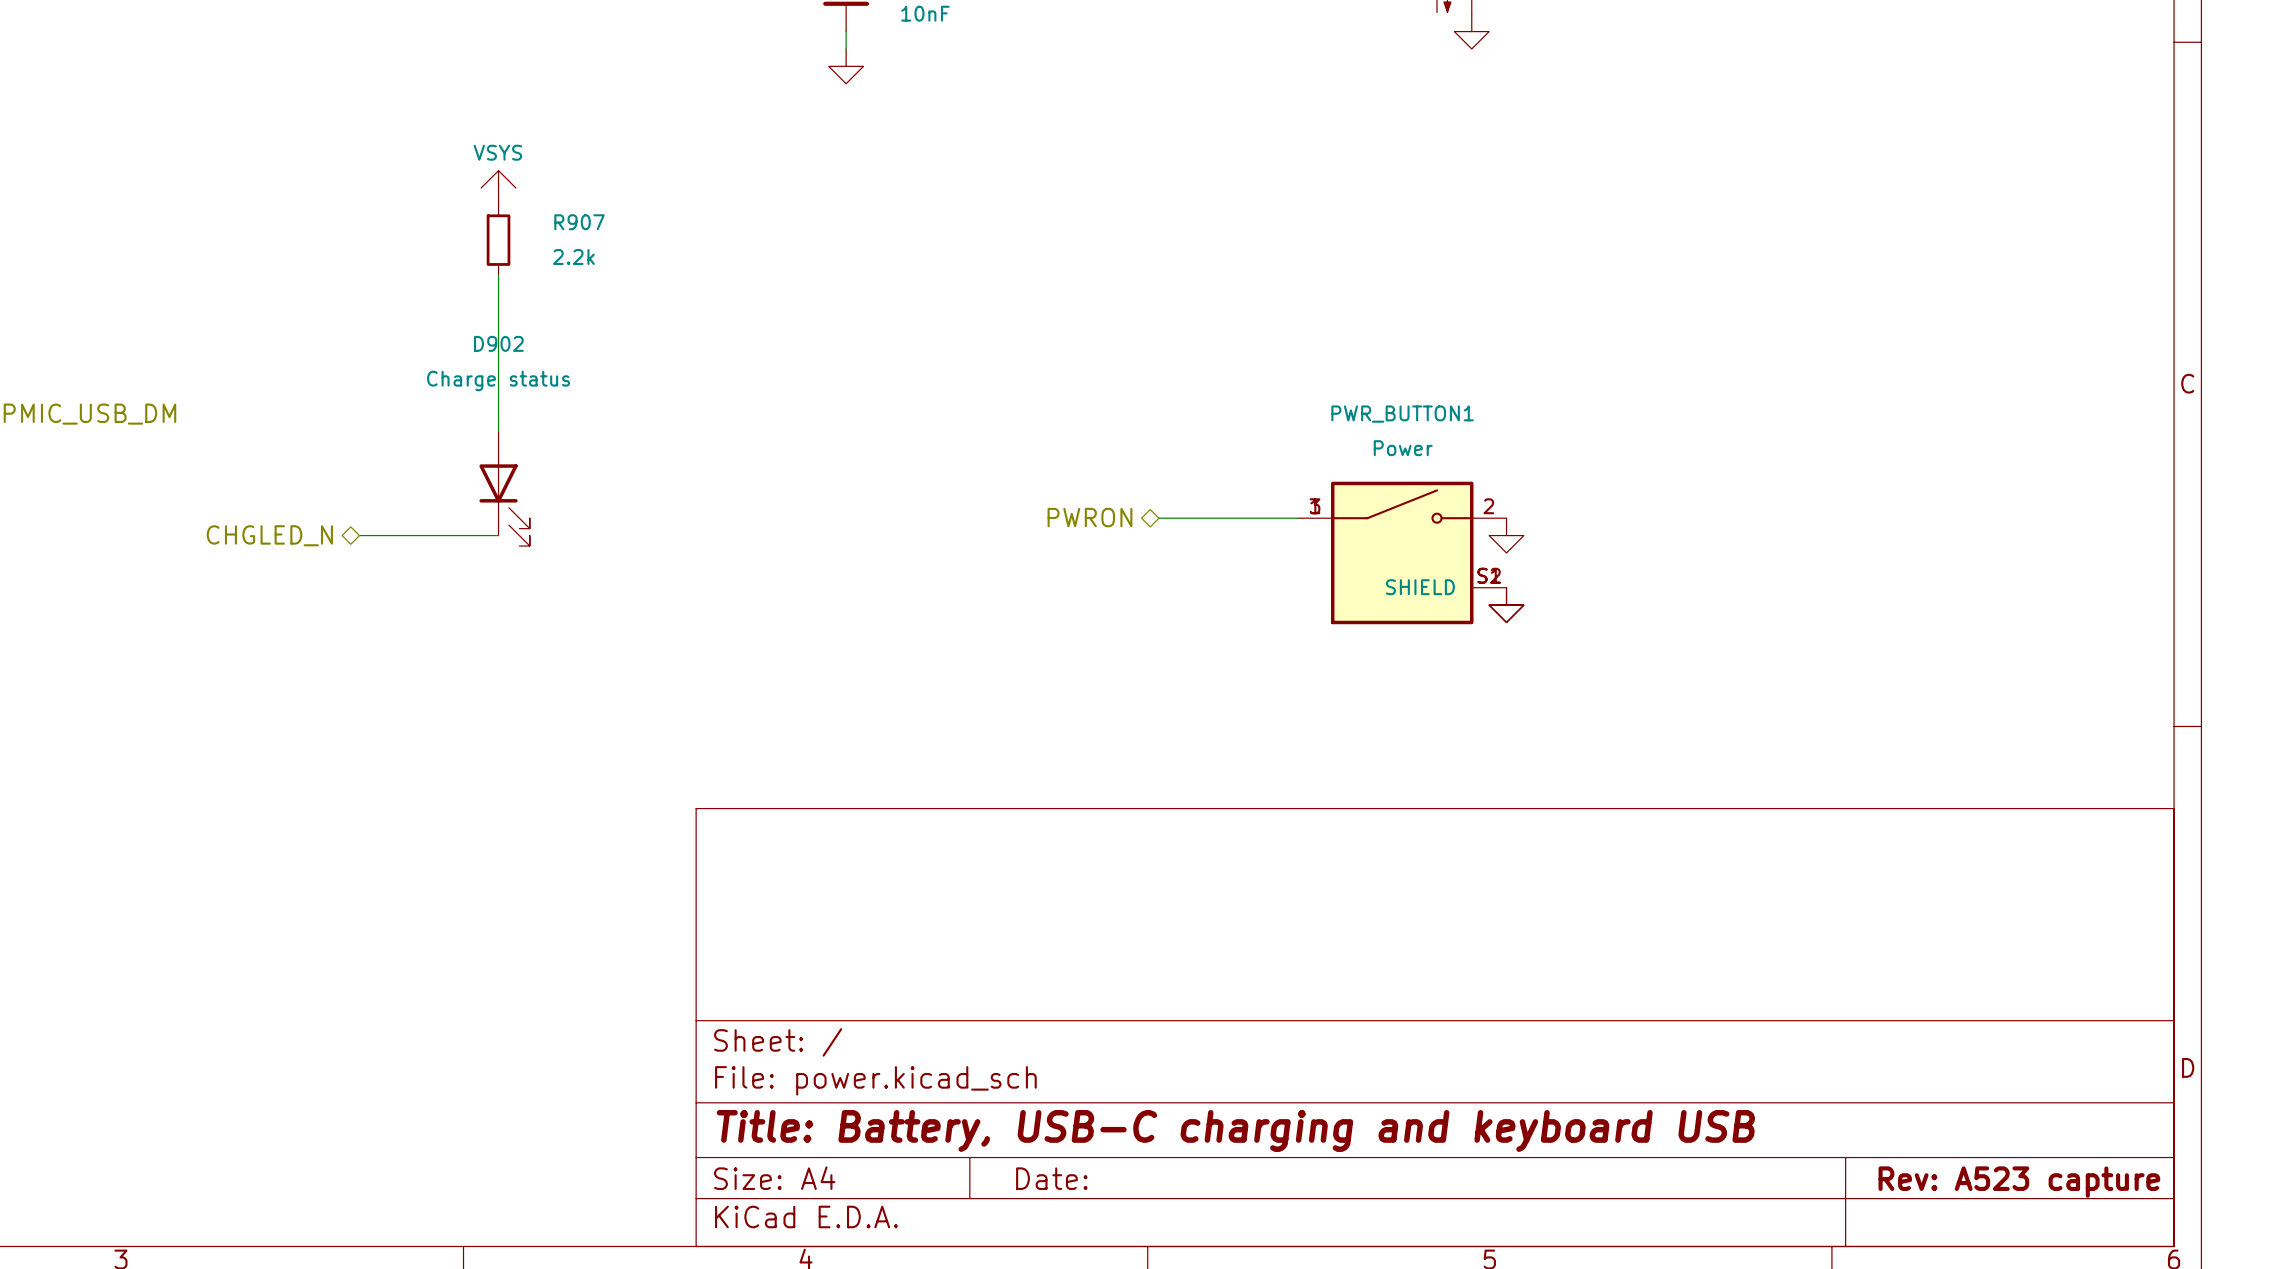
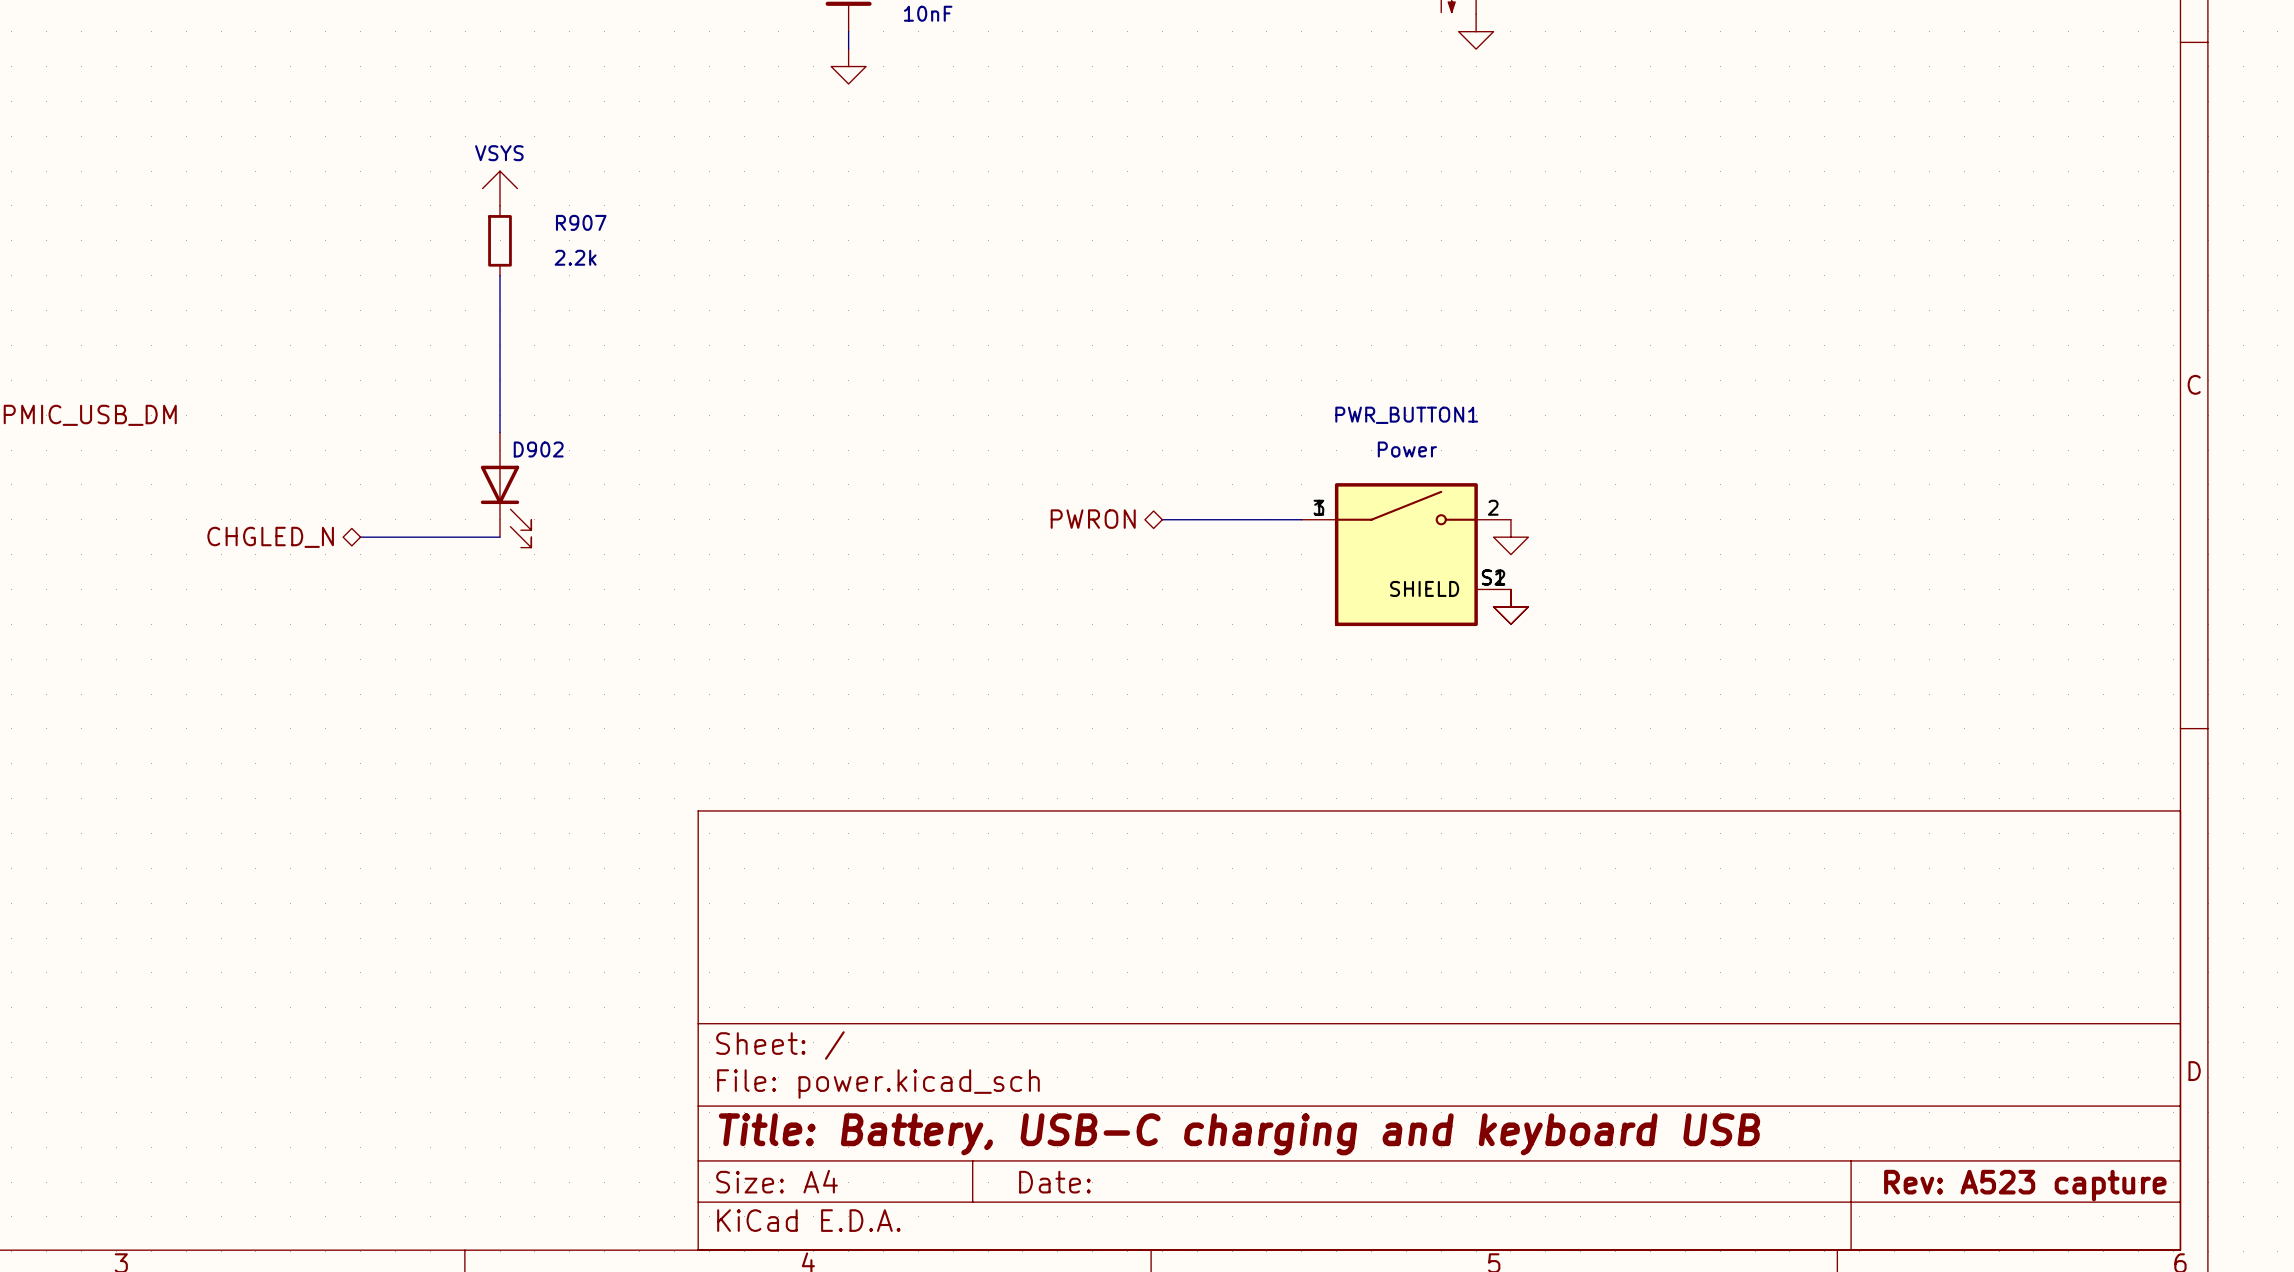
D902 name position: D902 (498, 343) -> D902 (538, 449)
D902 value: Charge status (498, 380) -> none

